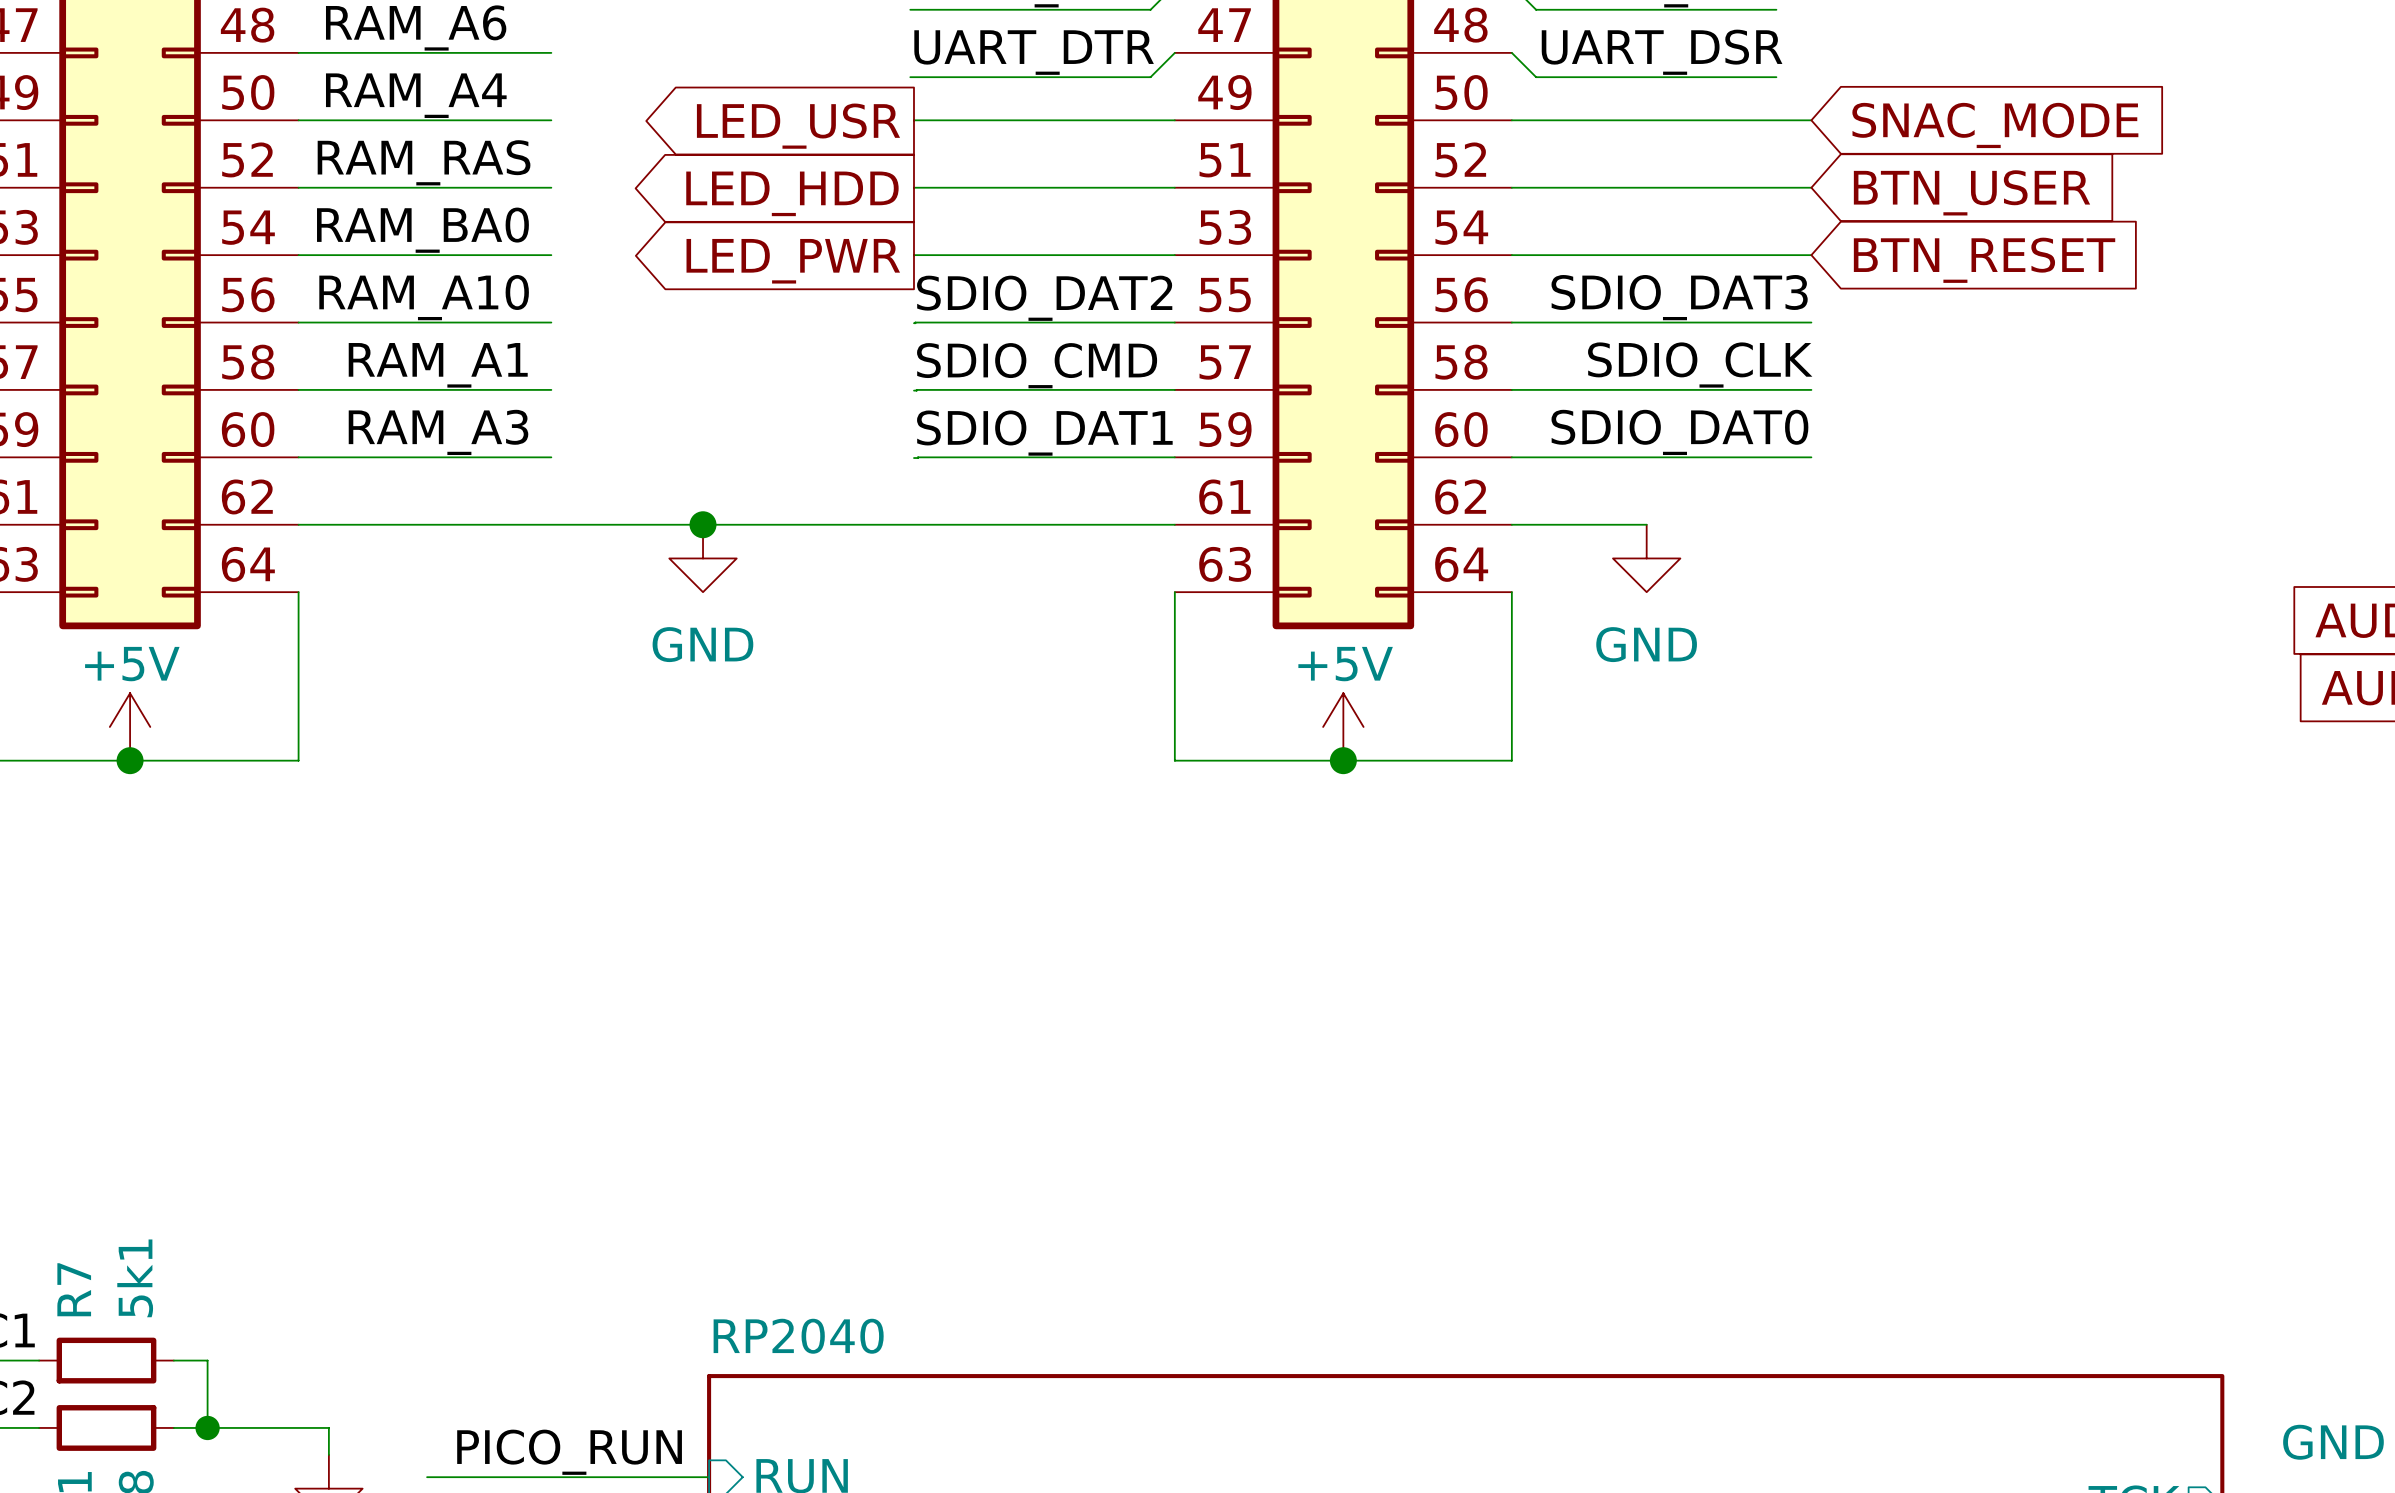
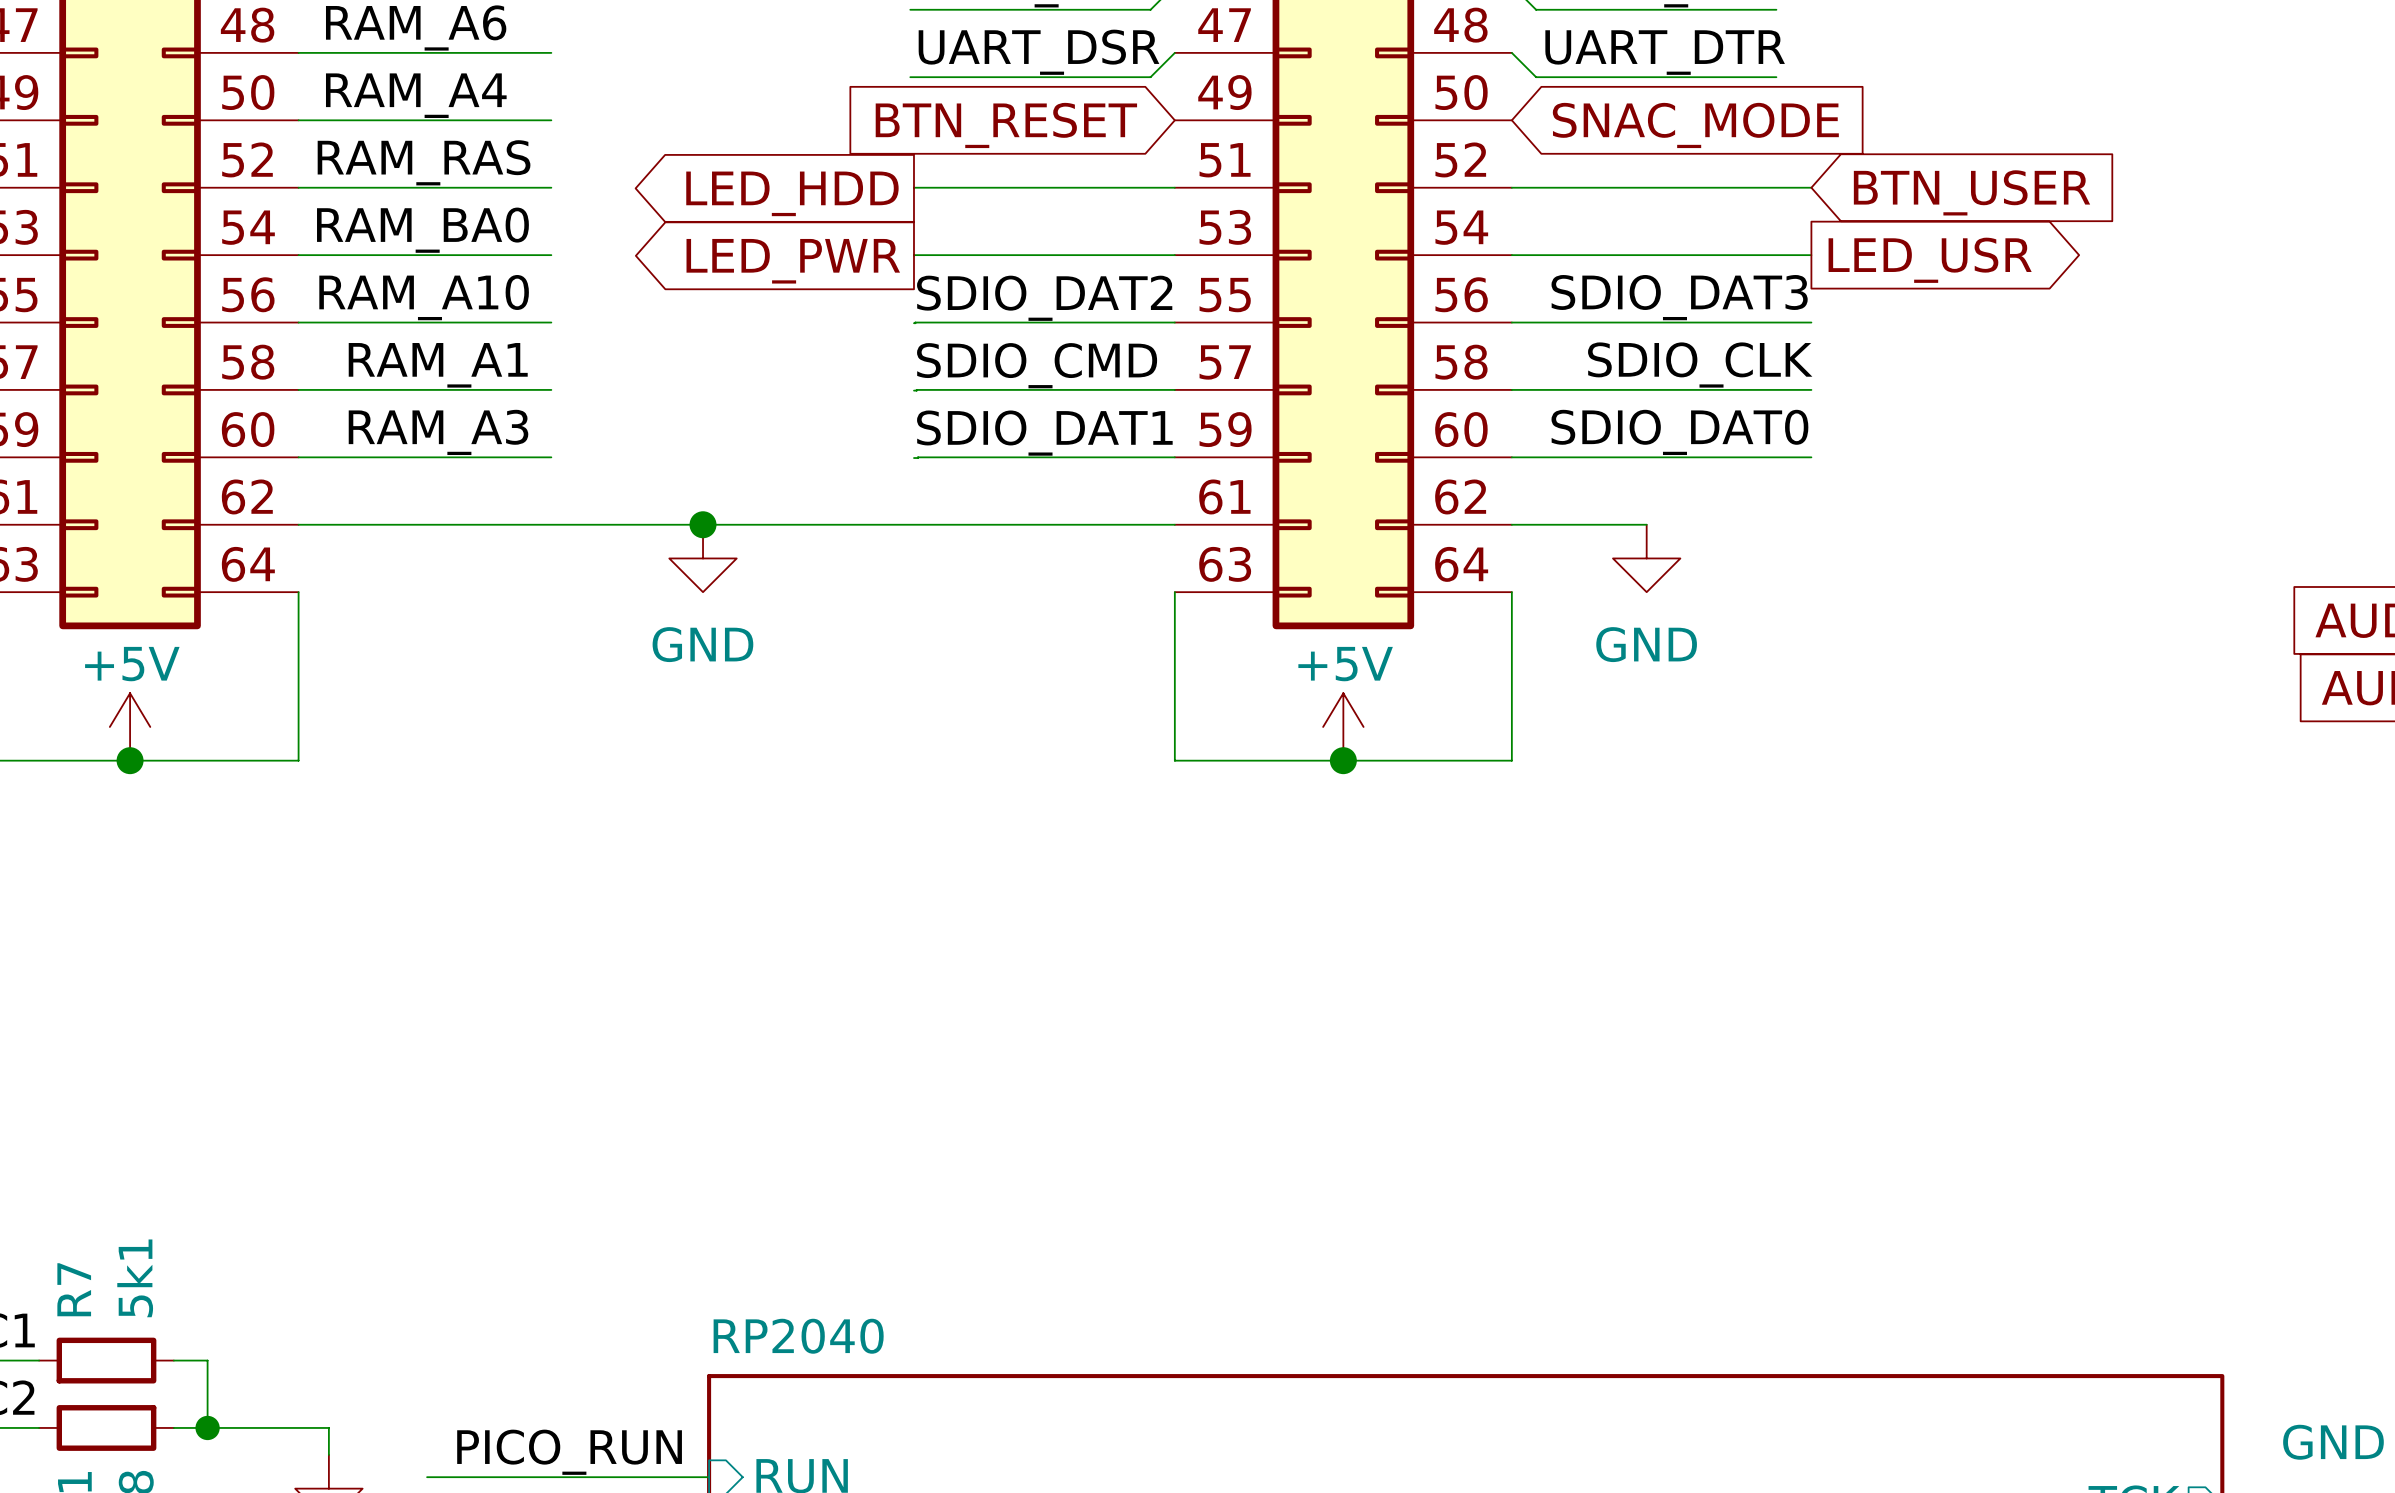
label: UART_DTR (1034, 52) -> UART_DSR (1039, 52)
label: UART_DSR (1662, 52) -> UART_DTR (1665, 52)
wire: (1174, 120) (913, 120) -> none
wire: (1511, 120) (1811, 120) -> none
global label: none -> BTN_RESET (1006, 125)
global label position: SNAC_MODE (1995, 125) -> SNAC_MODE (1695, 125)
global label: LED_USR (798, 126) -> none
global label shape: input (1984, 260) -> output (1930, 260)
global label: BTN_RESET (1984, 260) -> LED_USR (1930, 260)

